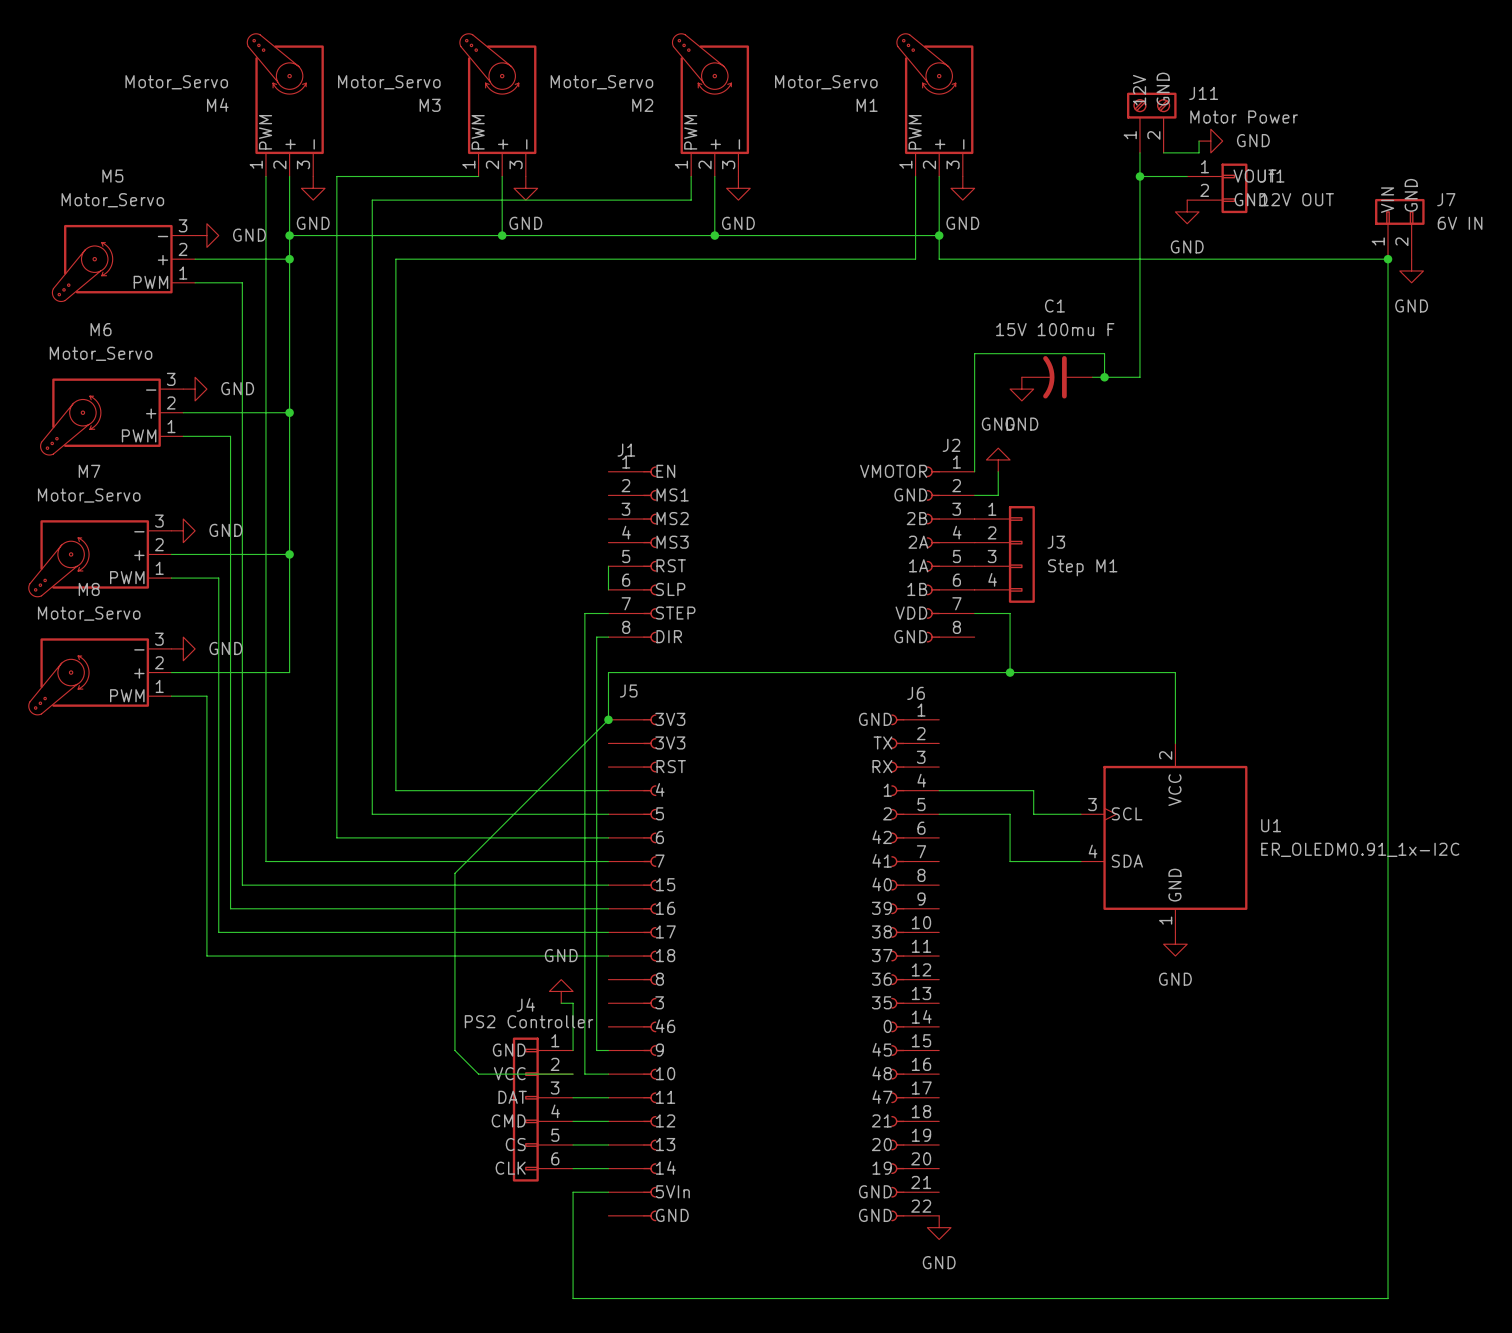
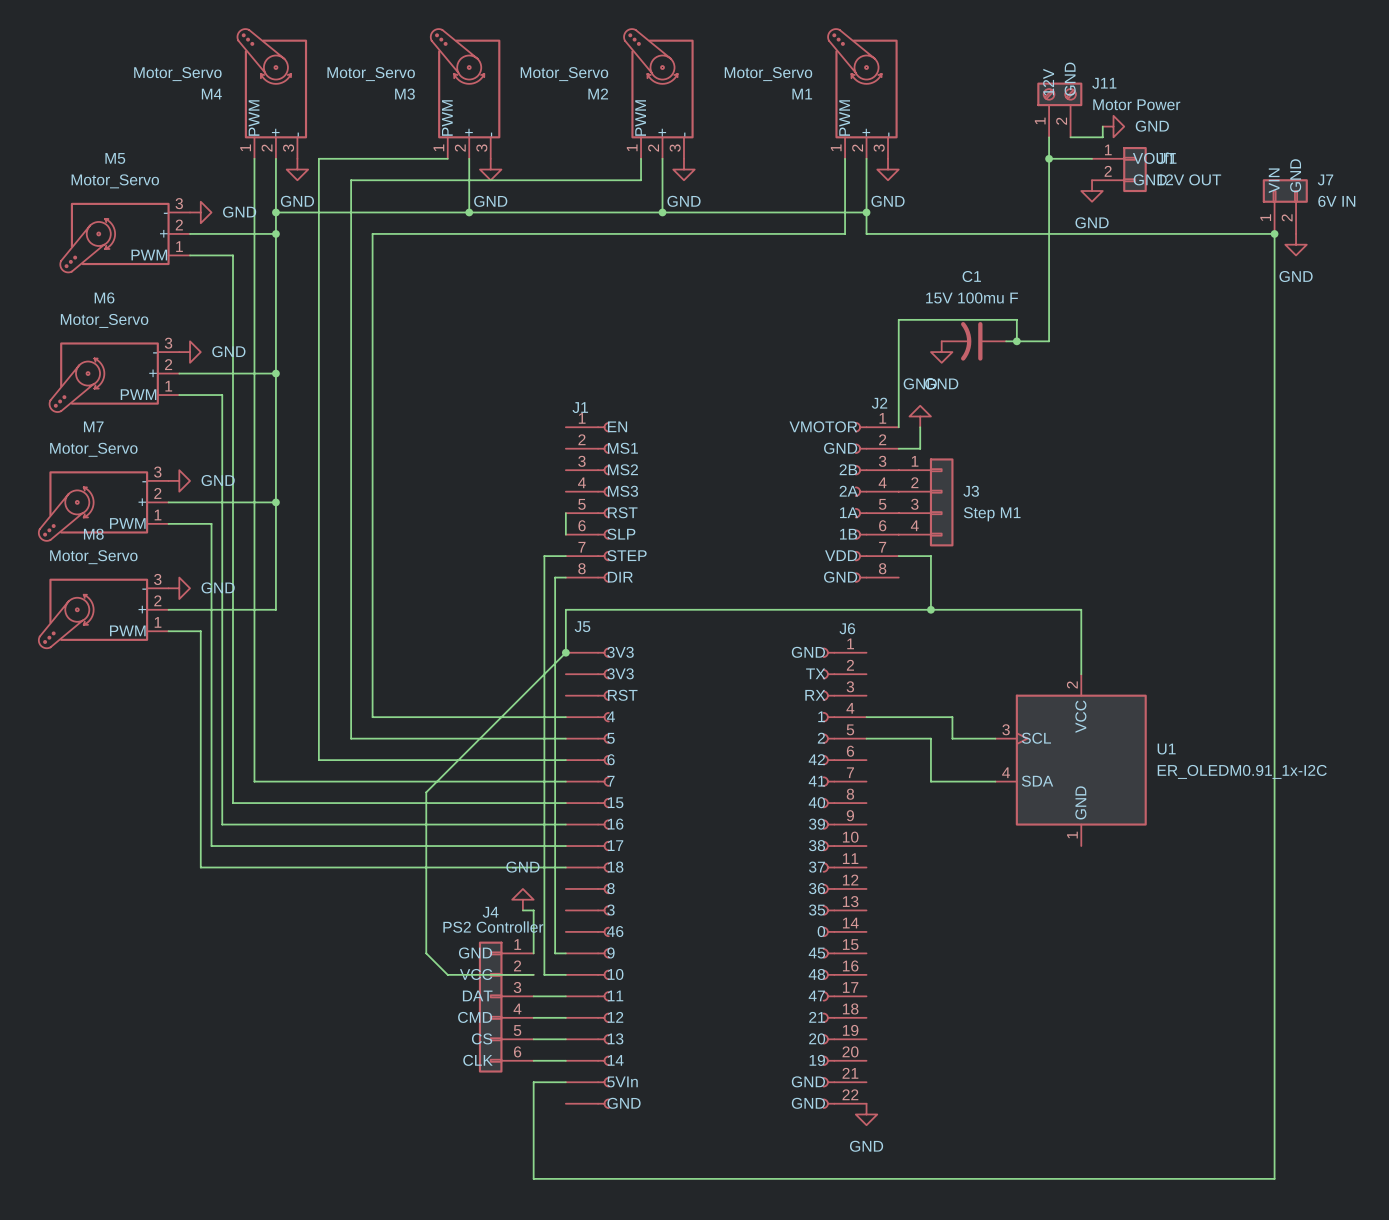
power symbol: GND (1175, 944) -> none

